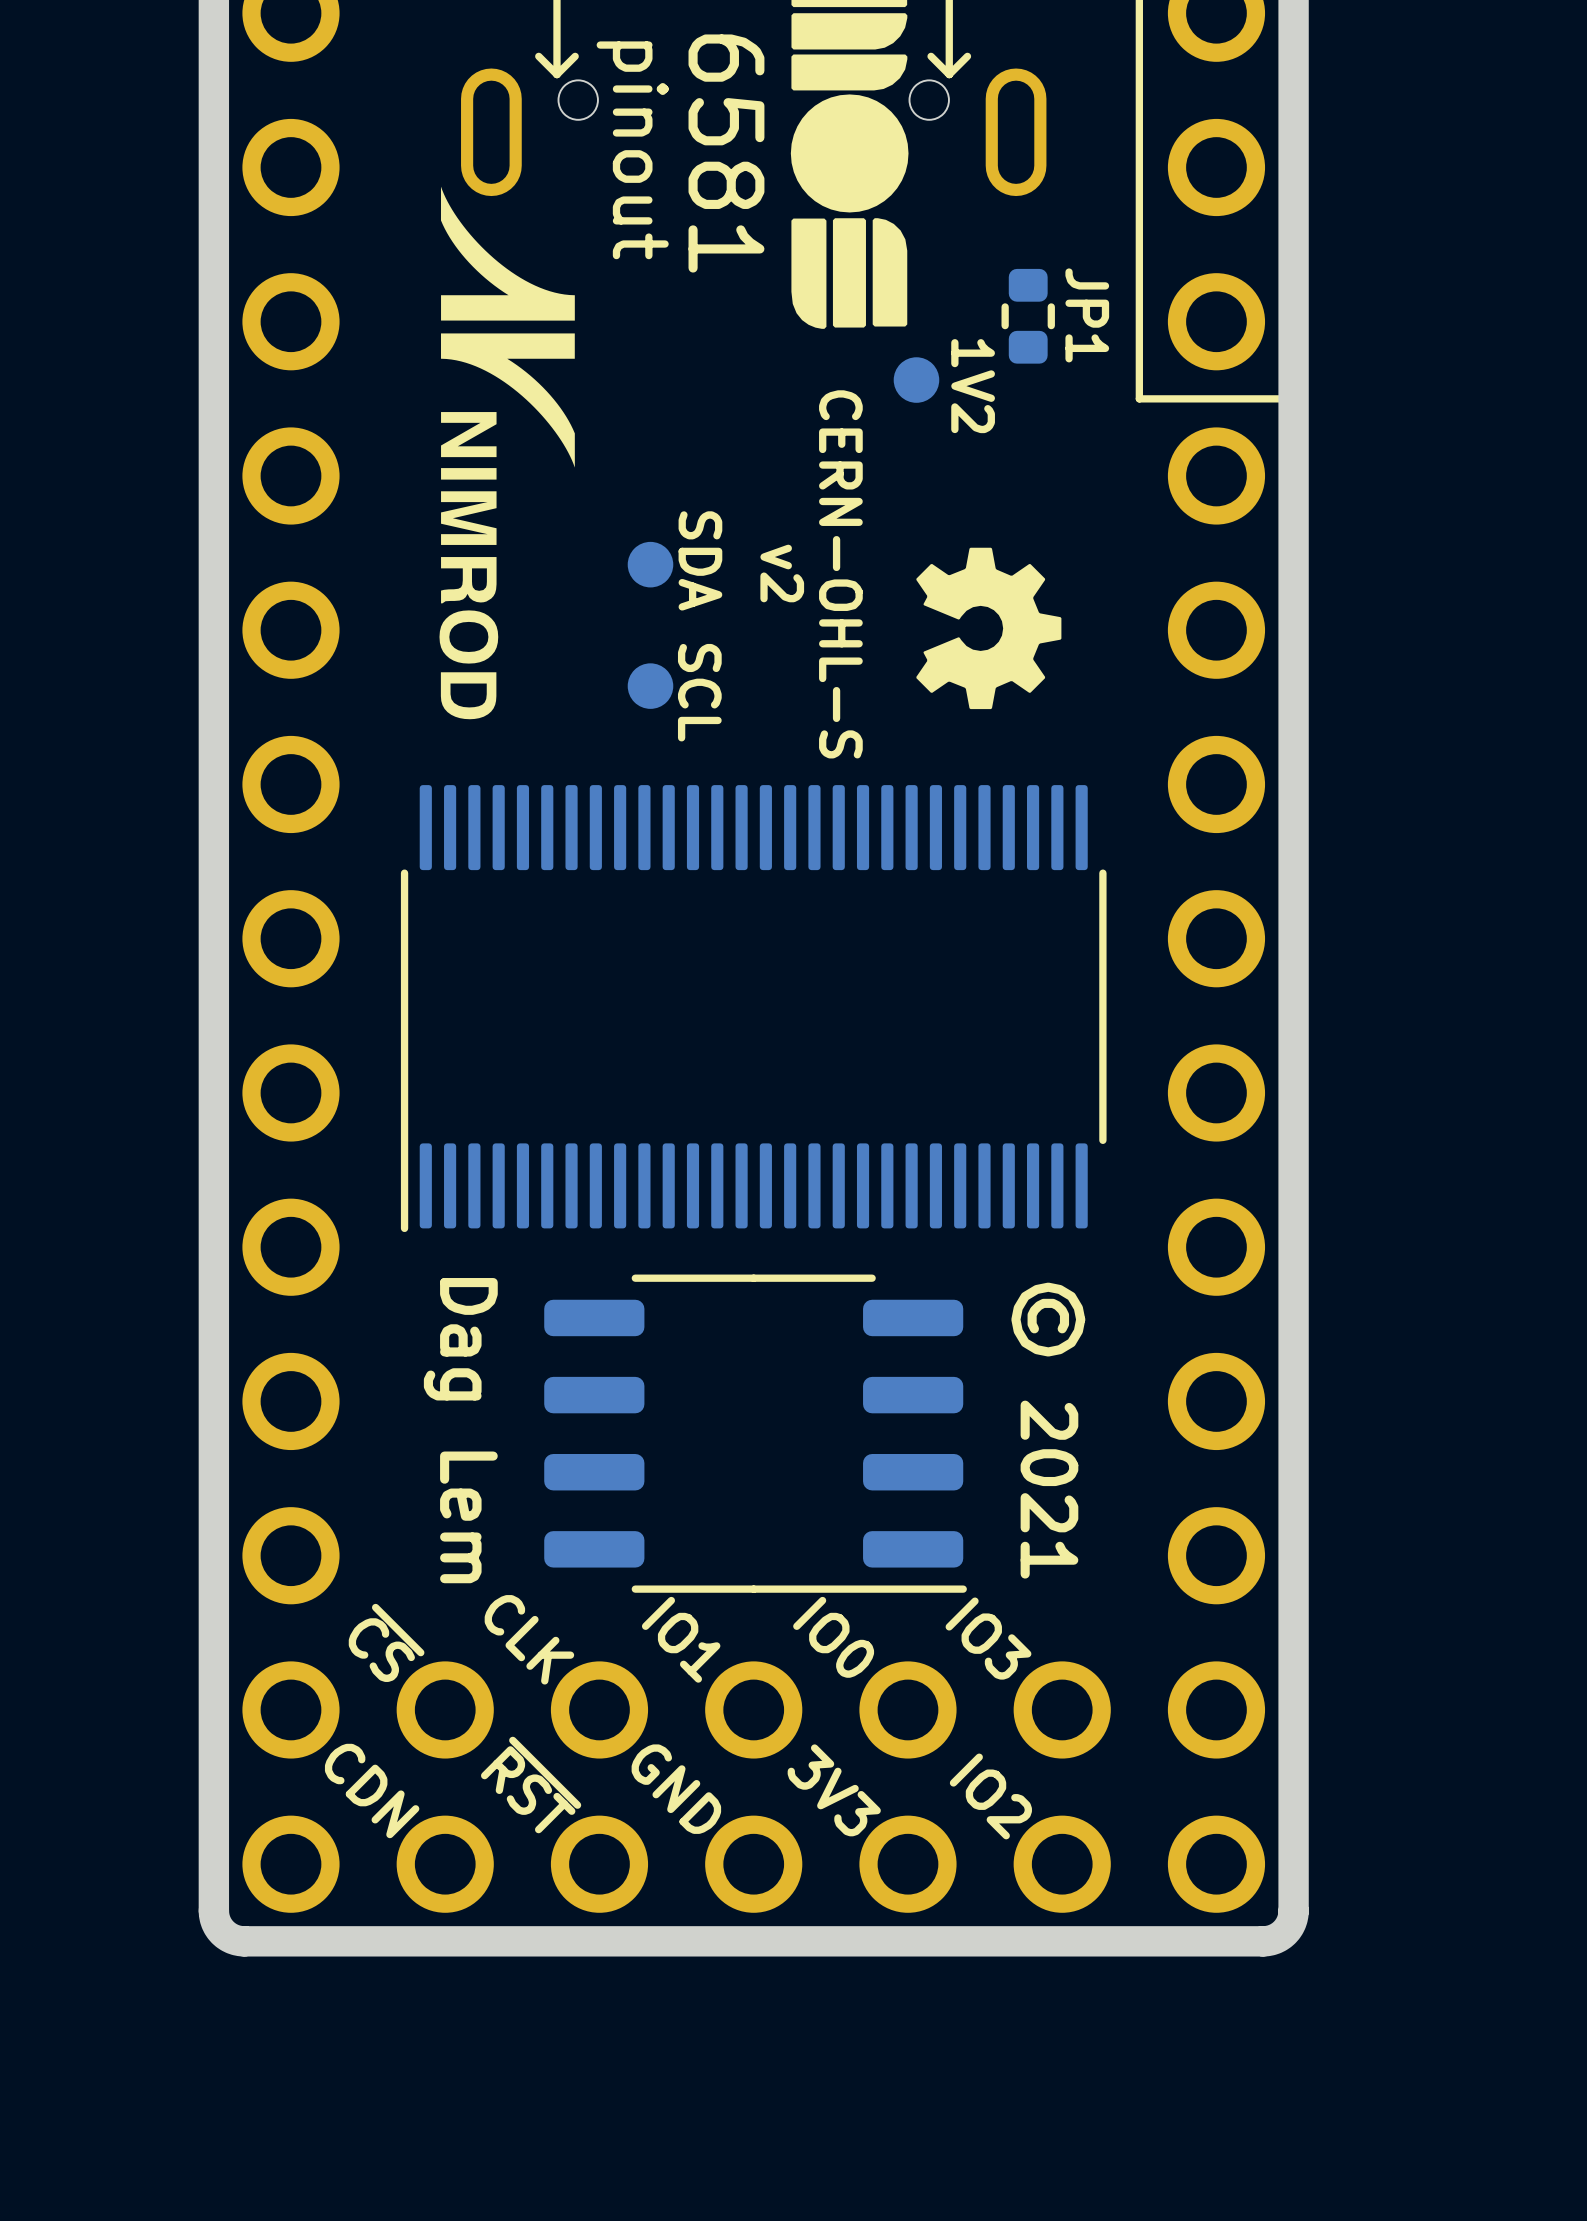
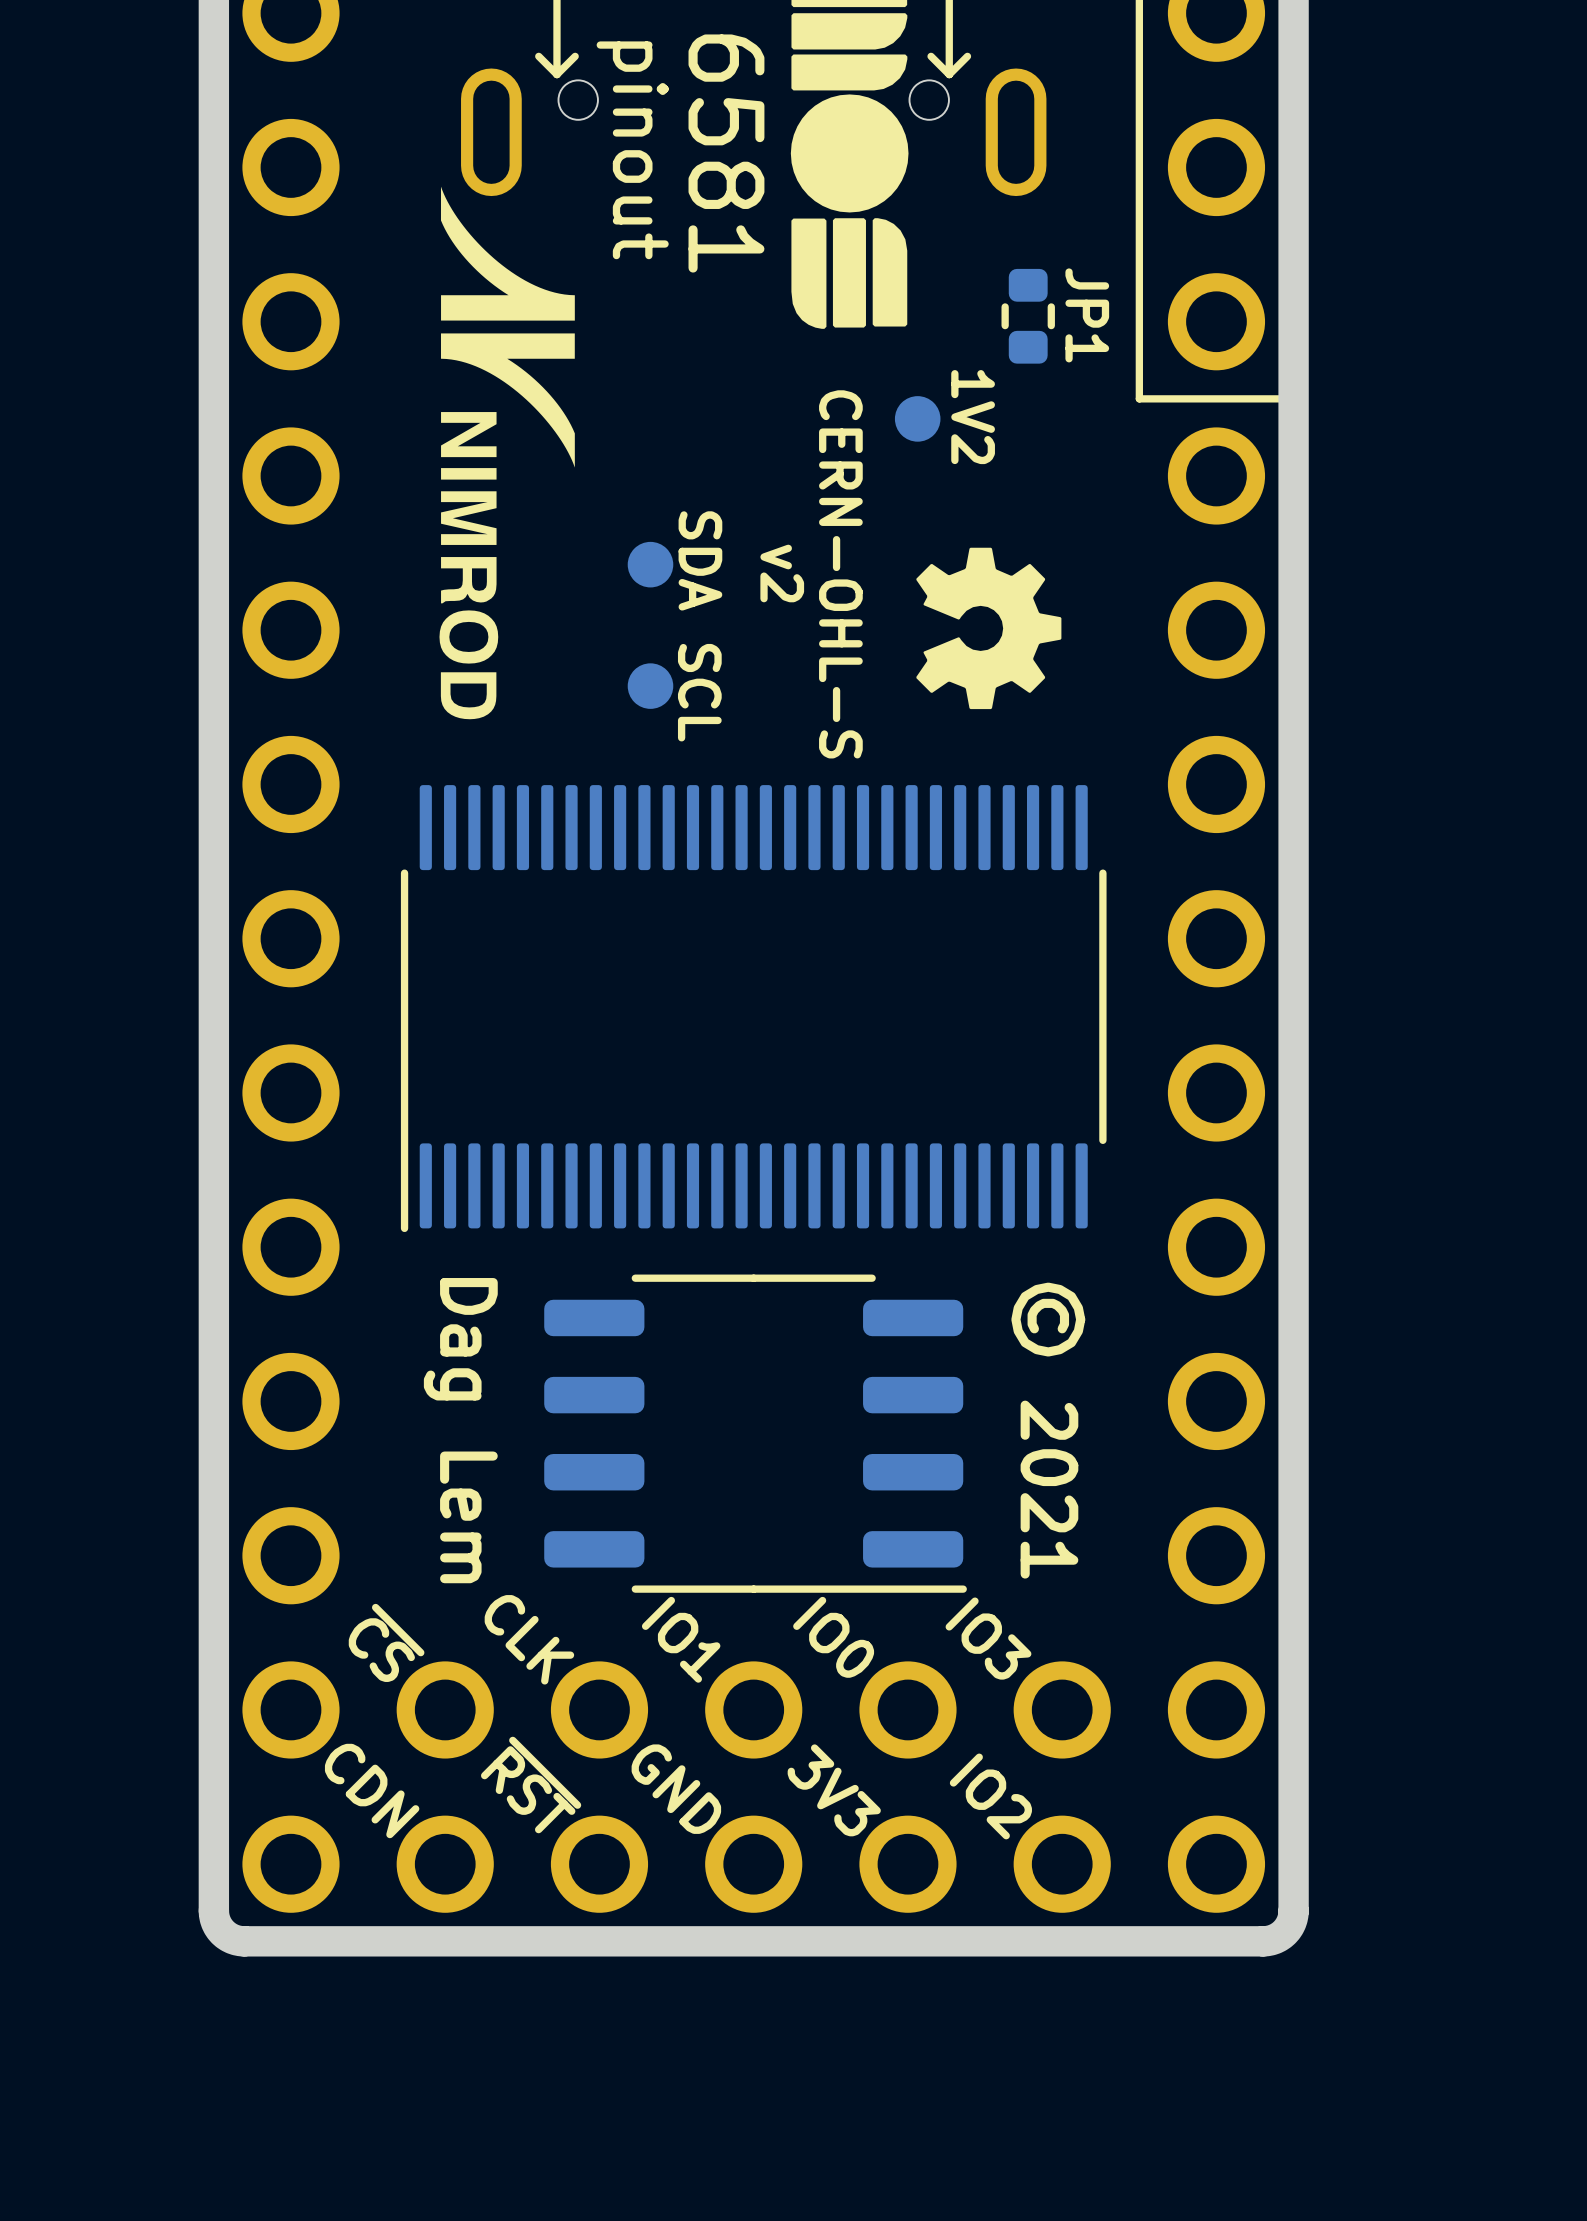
part position: (916, 380) -> (917, 418)
text position: 1V2 (973, 386) -> 1V2 (973, 417)

